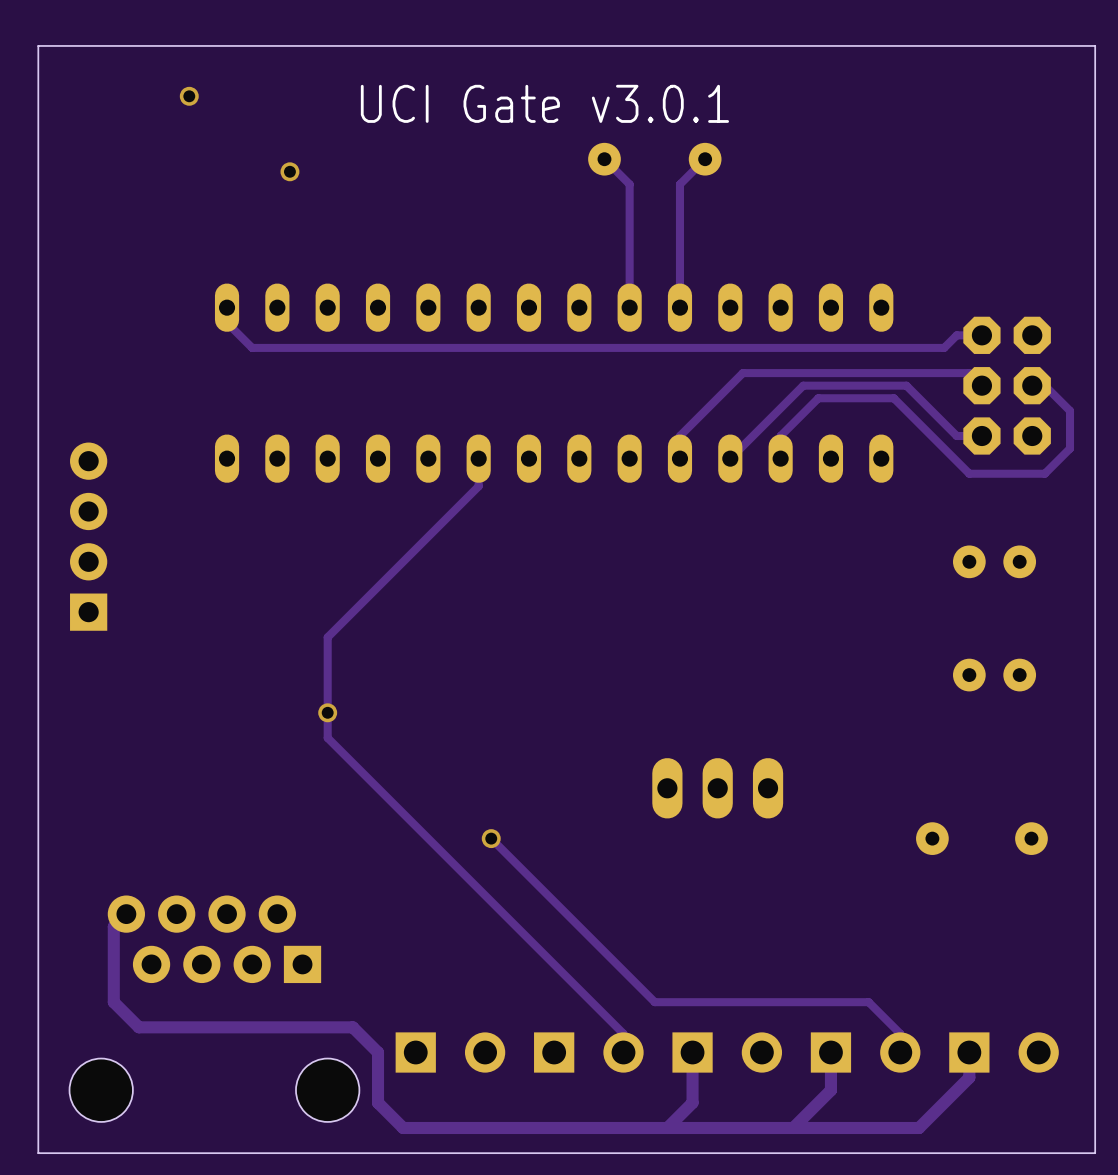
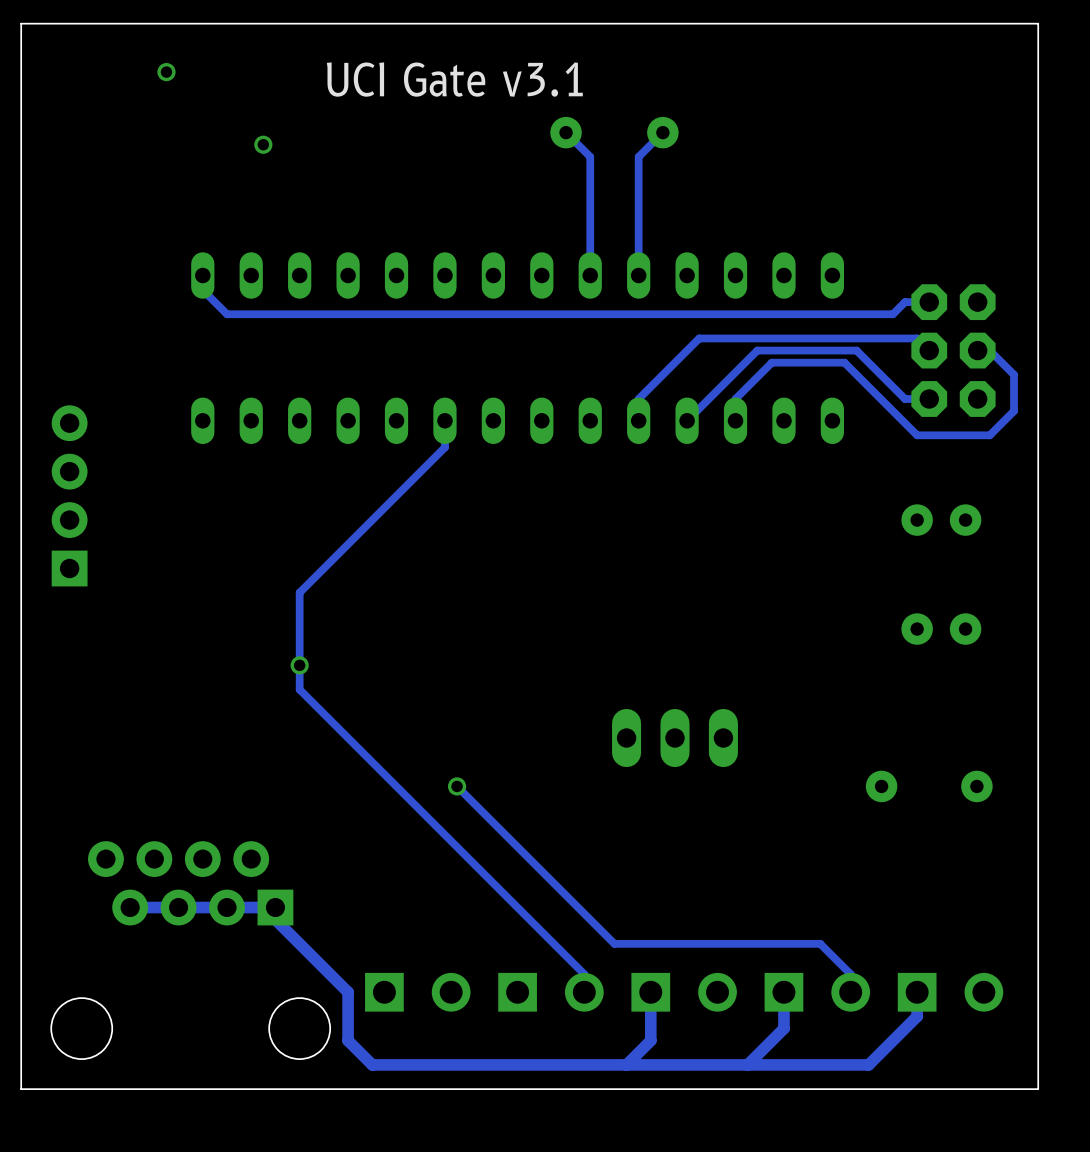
text: UCI Gate v3.0.1 (544, 103) -> UCI Gate v3.1 (454, 79)
track: (126, 914) (113, 926) (113, 1002) (138, 1027) (352, 1027) -> (130, 907) (275, 907) (275, 919) (323, 968)

